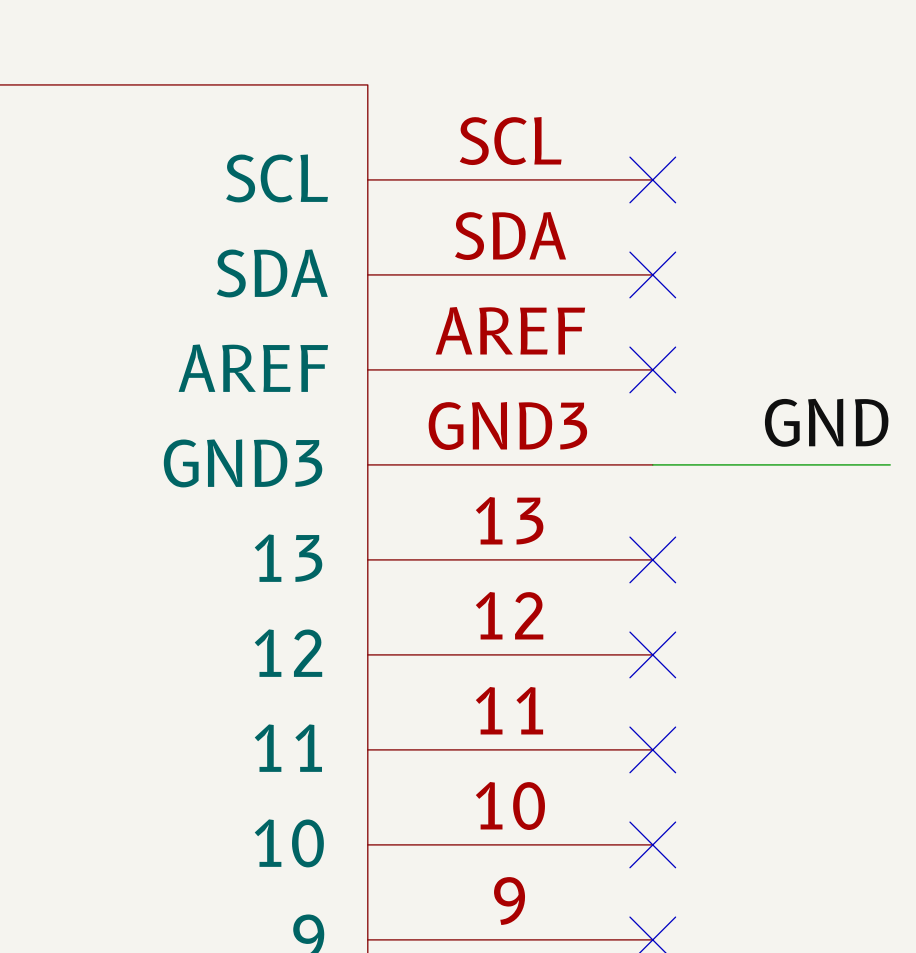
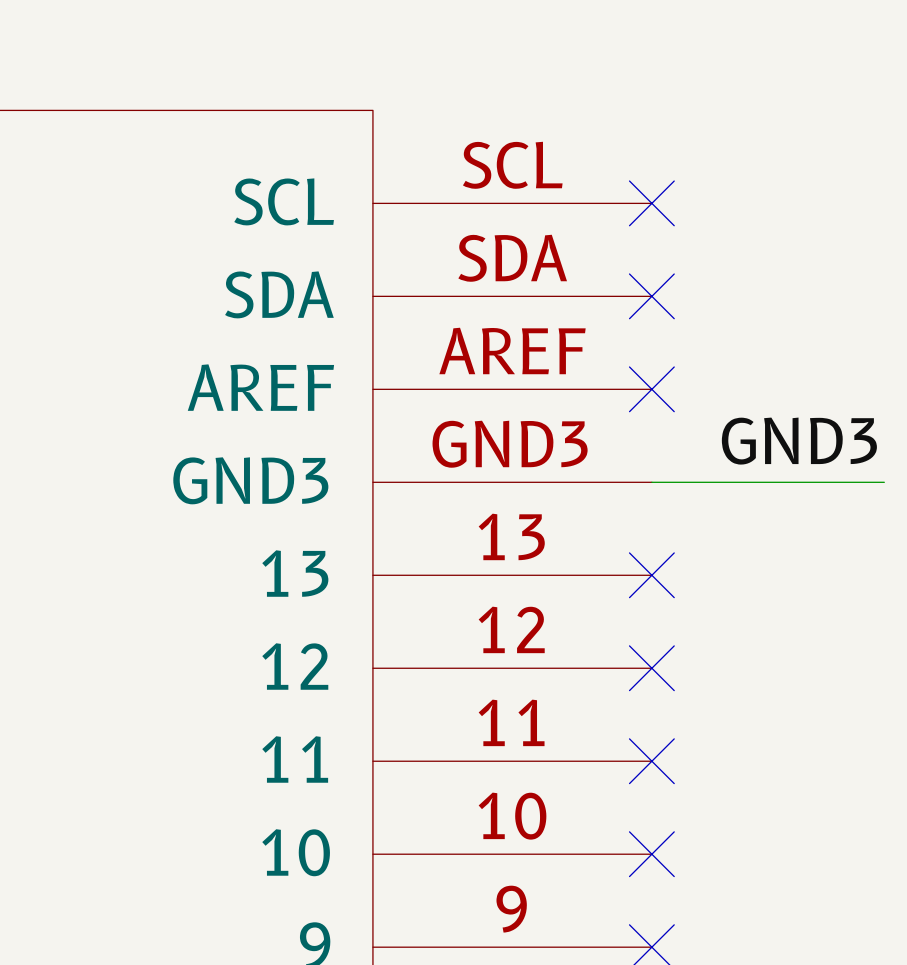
label: GND (826, 422) -> GND3 (799, 441)

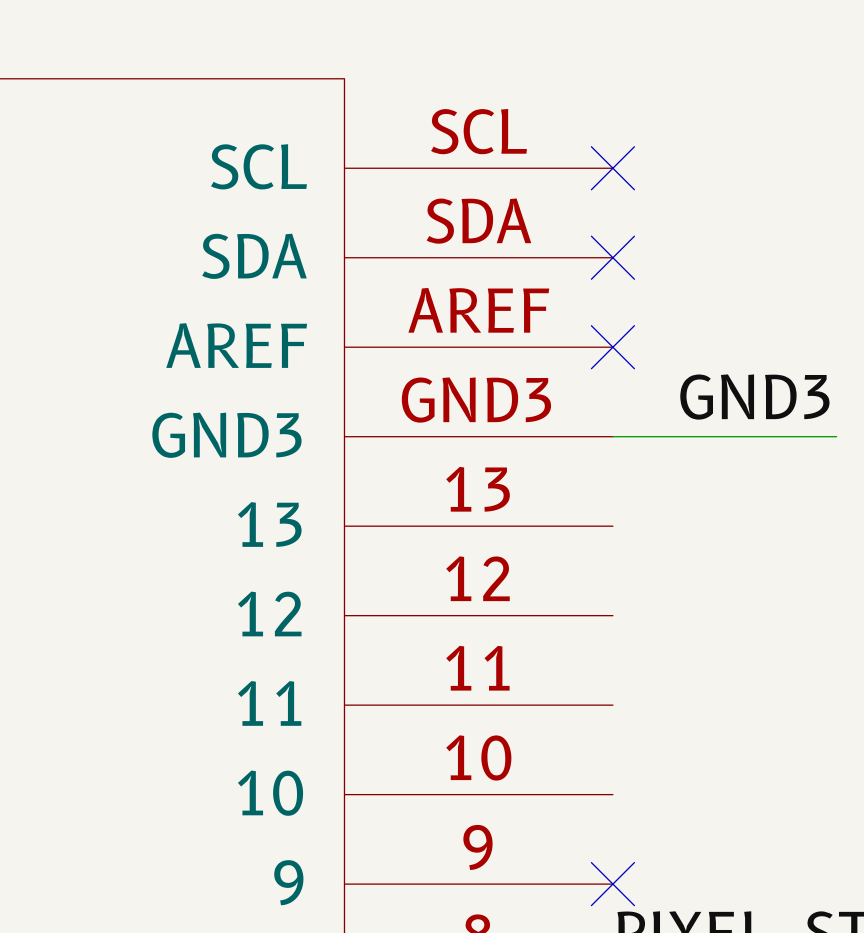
no-connect mark: (651, 575) -> none
no-connect mark: (651, 668) -> none
no-connect mark: (651, 761) -> none
no-connect mark: (651, 854) -> none

